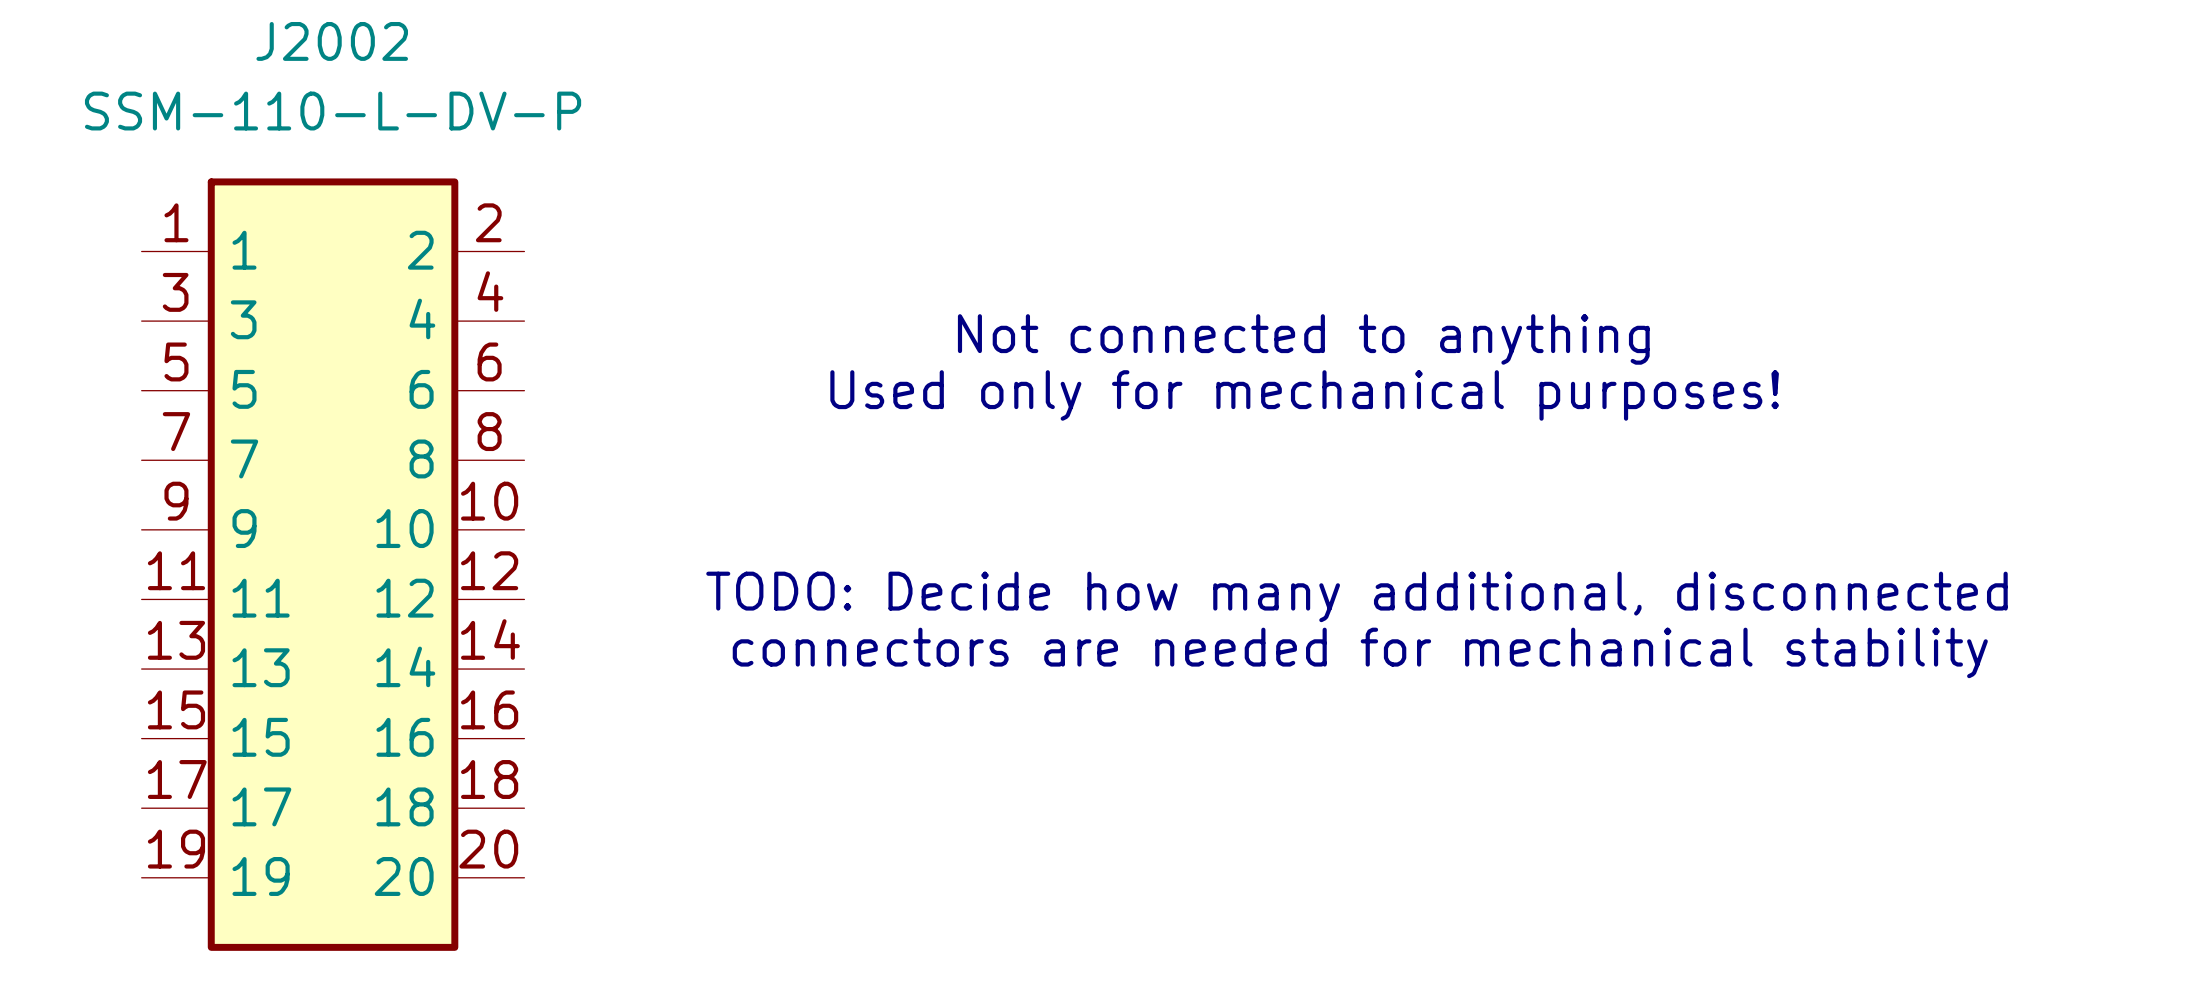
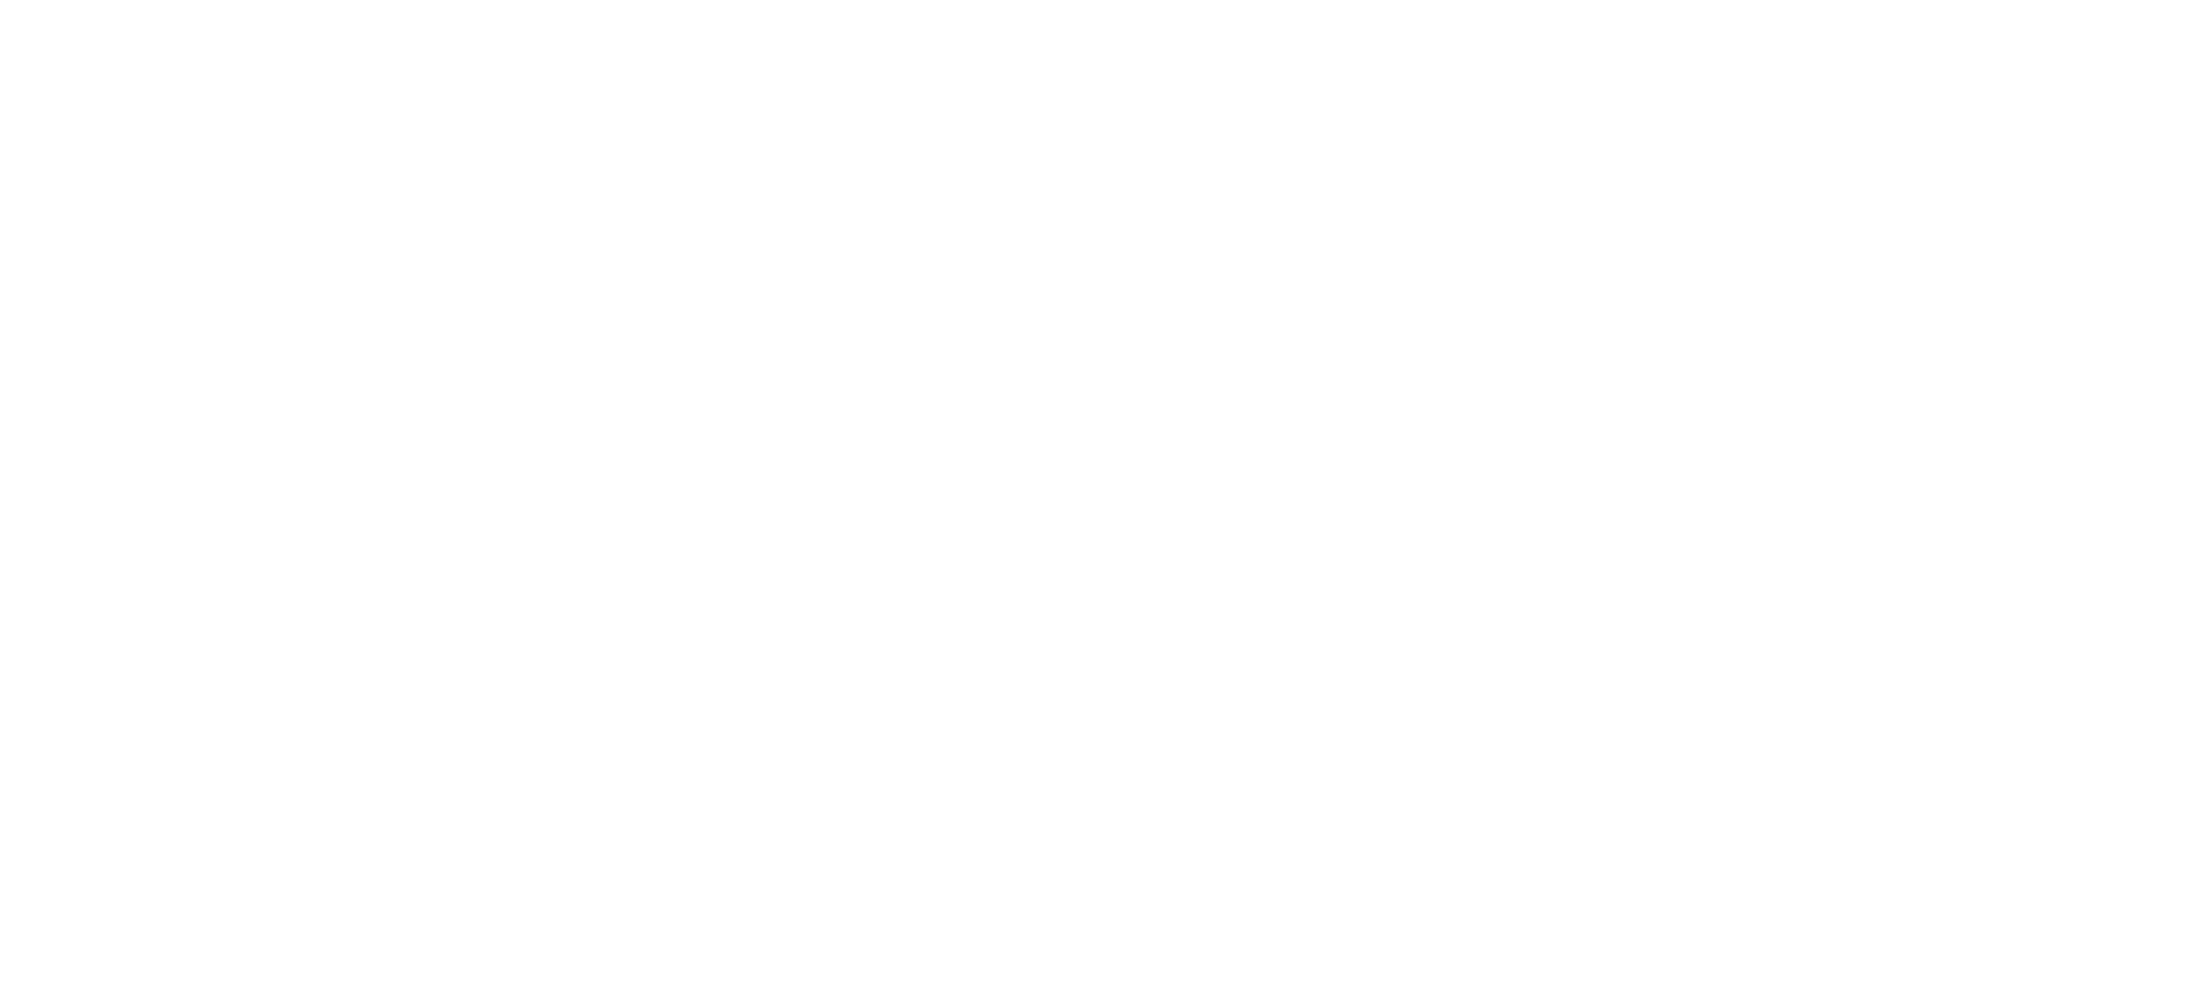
text: Not connected to anything (1303, 339) -> none
text: Used only for mechanical purposes! (1304, 395) -> none
J2002: (333, 564) -> none
text: TODO: Decide how many additional, disconnected (1356, 596) -> none
text: connectors are needed for mechanical stability (1360, 652) -> none

